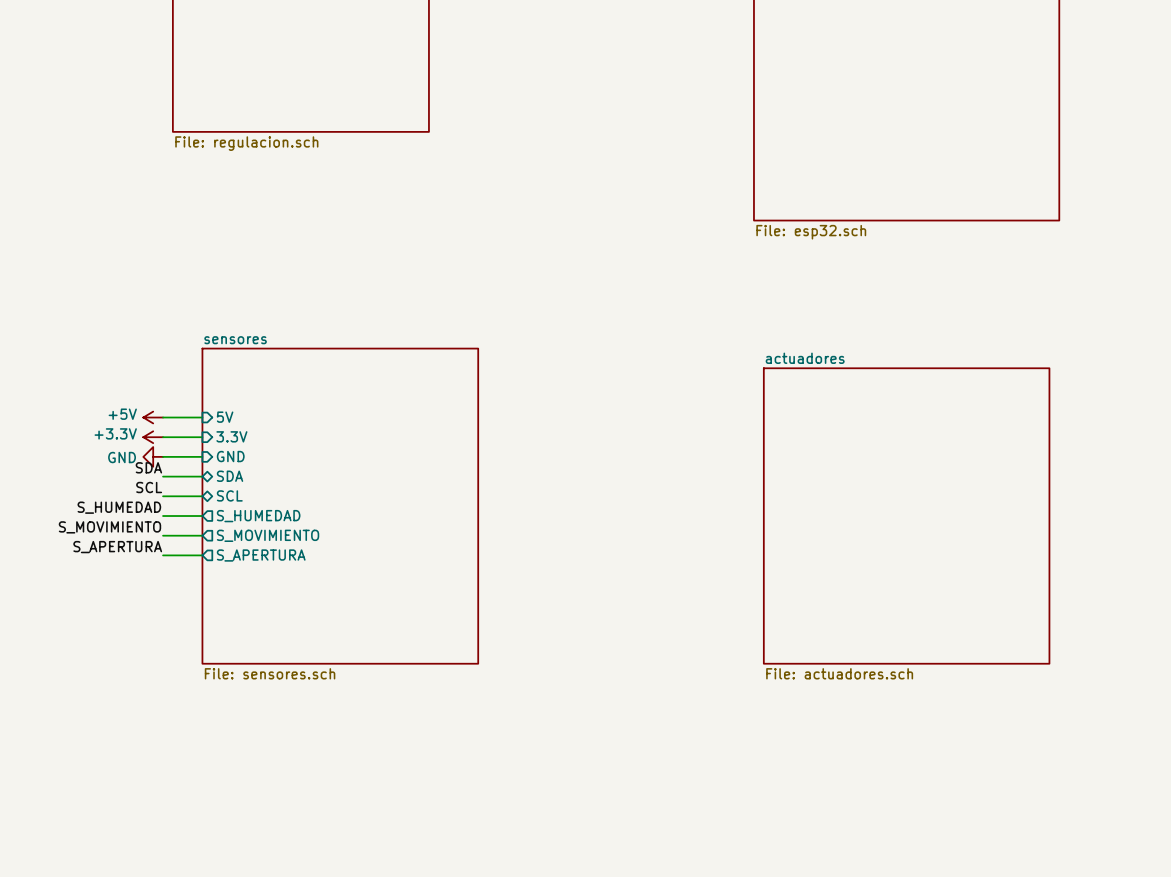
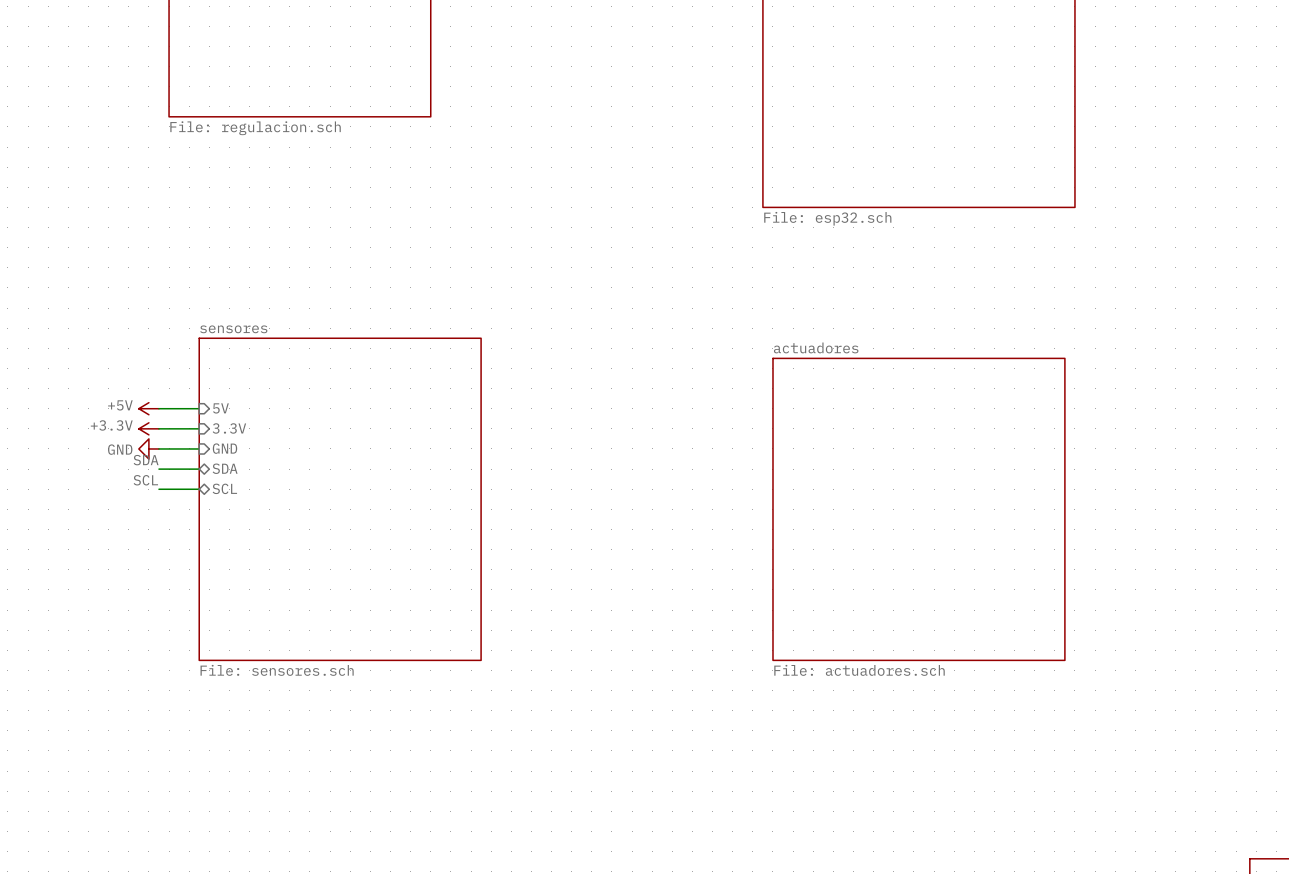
label: S_HUMEDAD (119, 507) -> none
wire: (163, 516) (202, 516) -> none
sheet pin: S_HUMEDAD (258, 516) -> none
label: S_MOVIMIENTO (109, 527) -> none
wire: (163, 535) (202, 535) -> none
sheet pin: S_MOVIMIENTO (268, 535) -> none
label: S_APERTURA (117, 547) -> none
wire: (163, 555) (202, 555) -> none
sheet pin: S_APERTURA (261, 555) -> none

